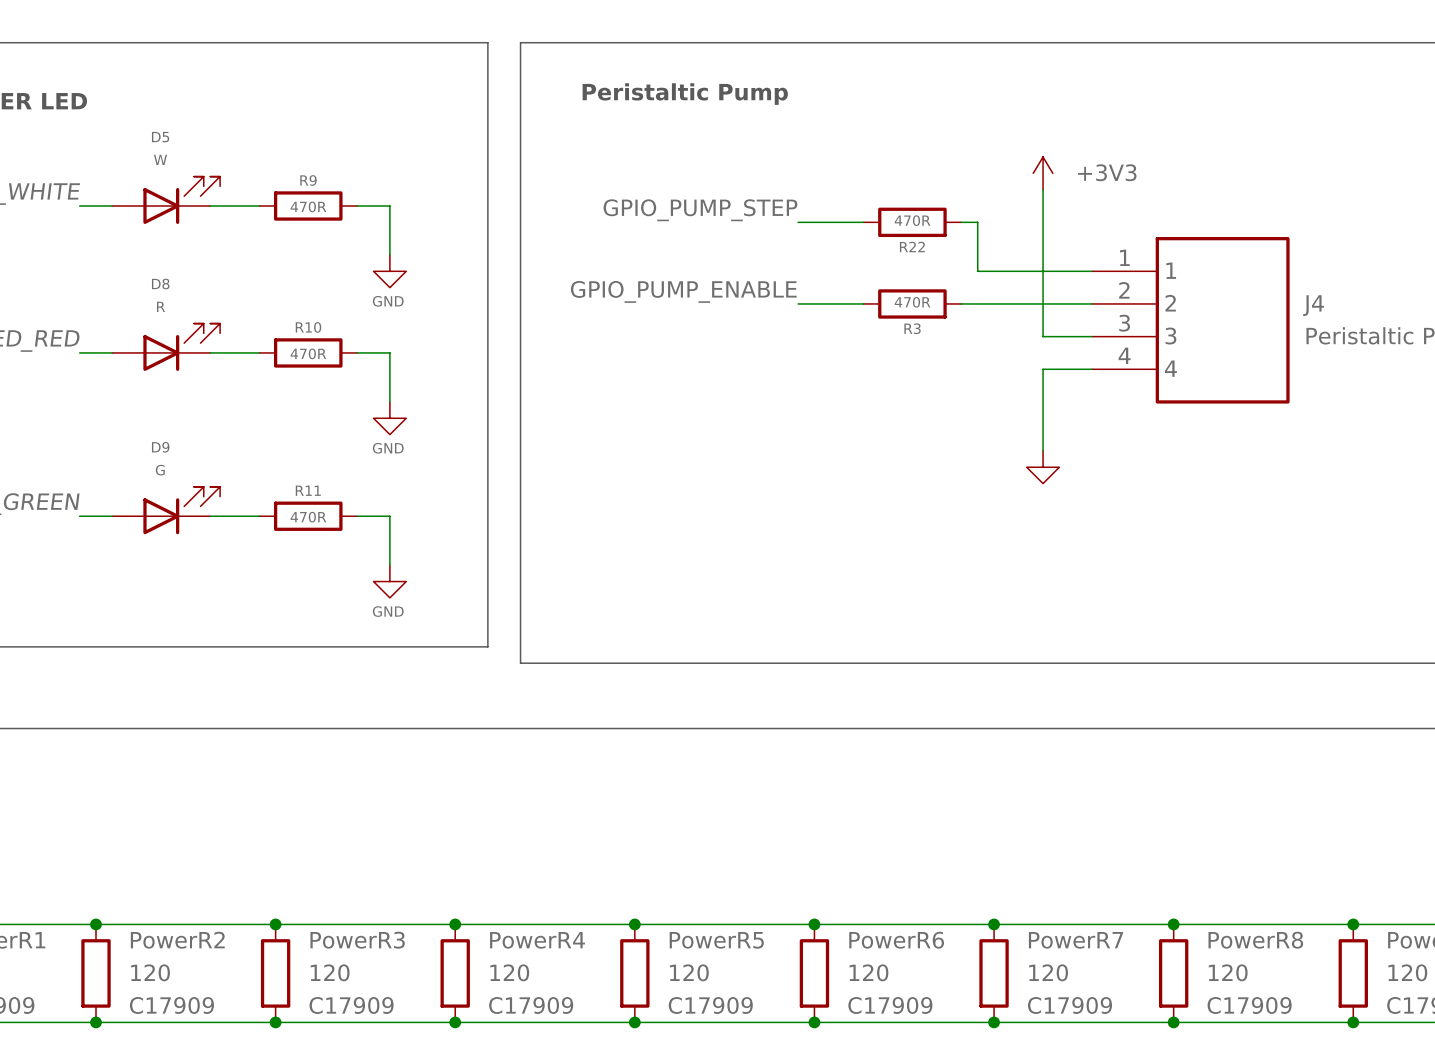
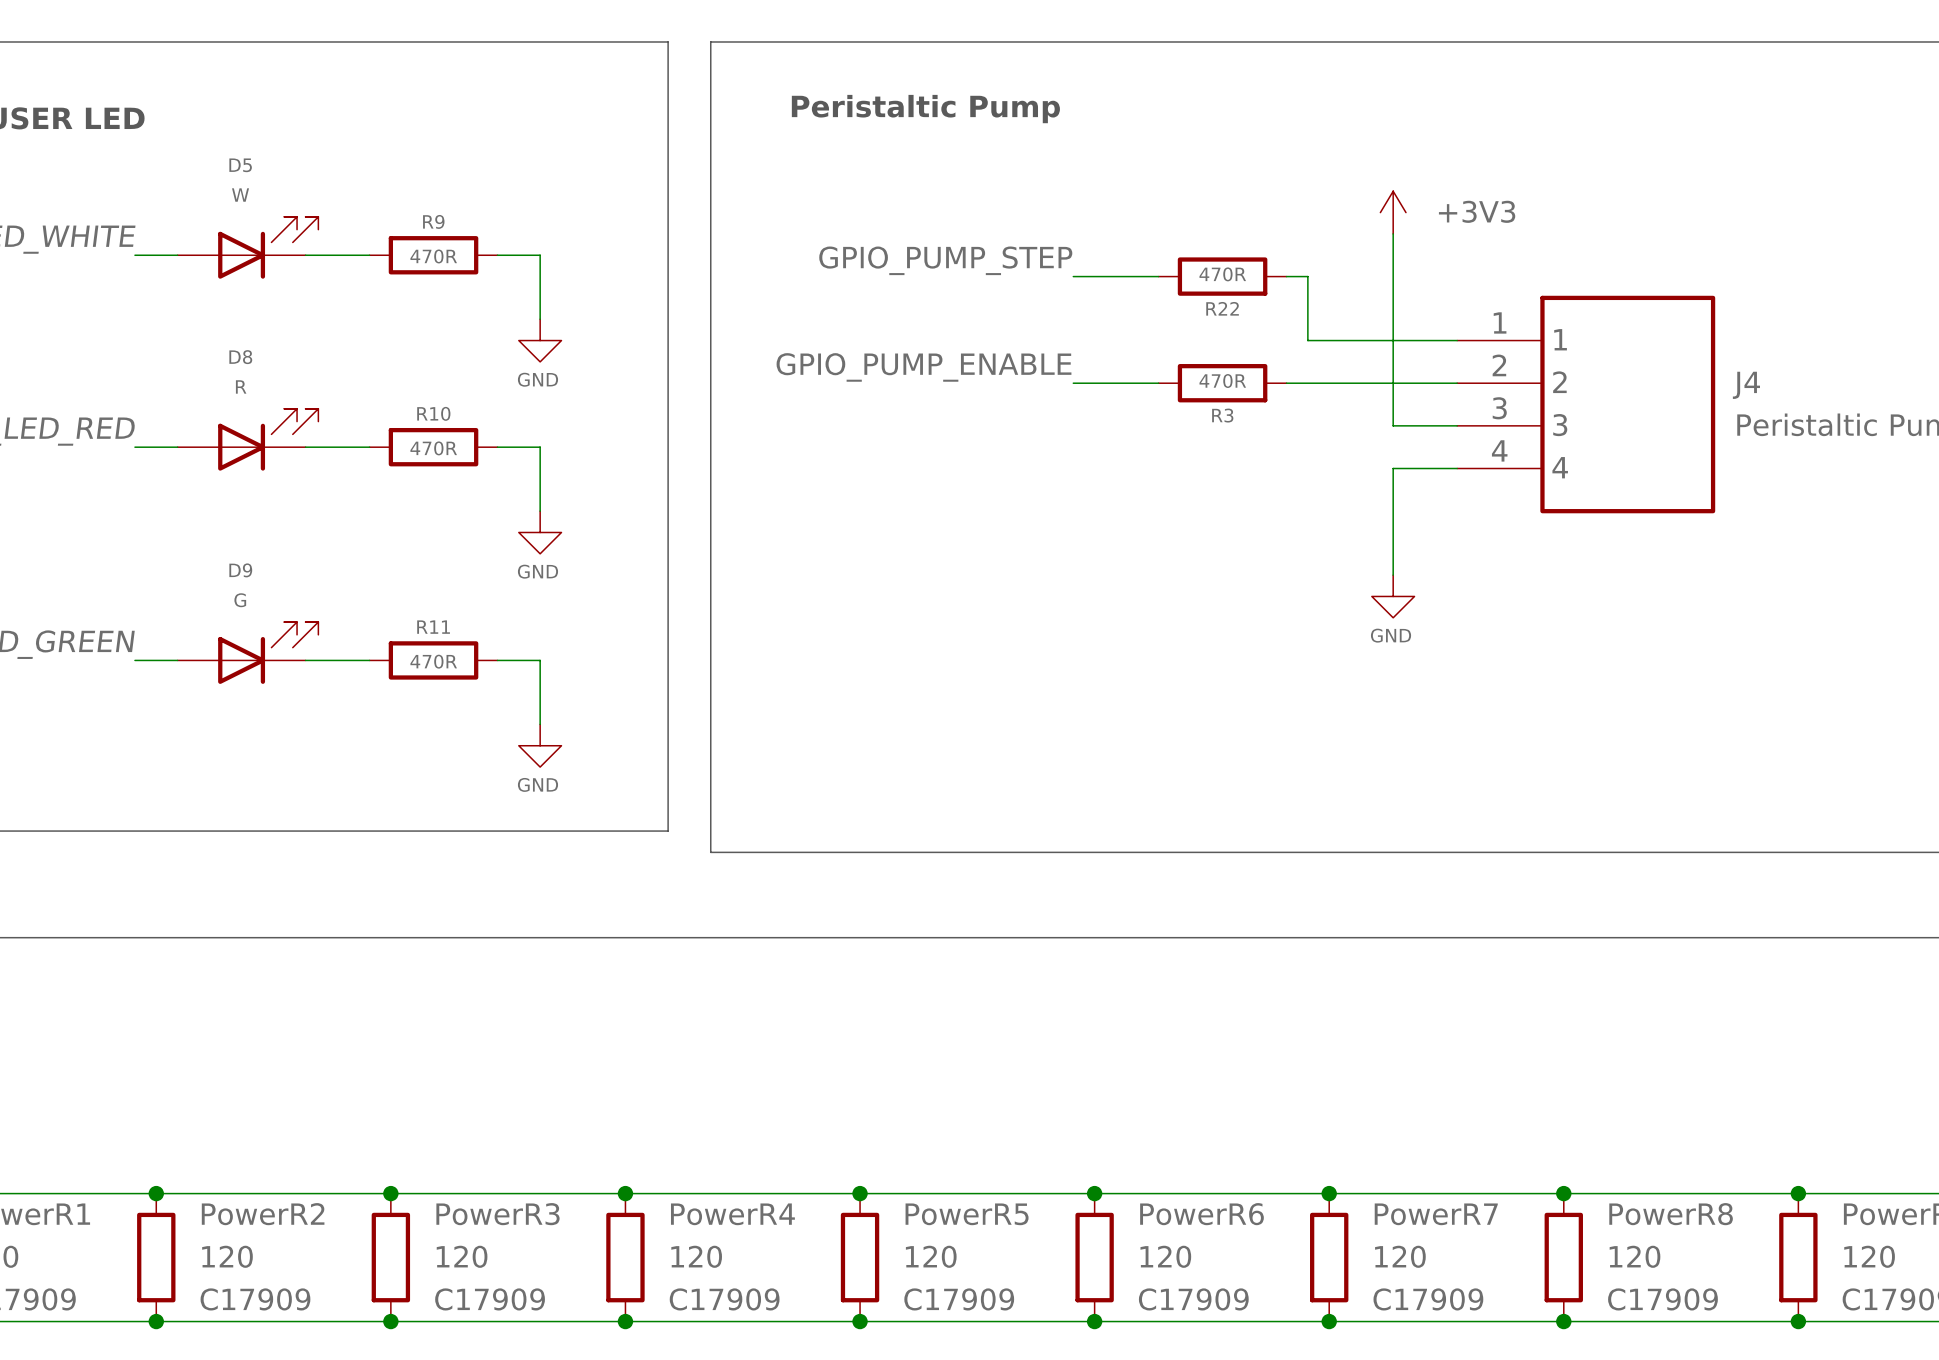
power symbol text: none -> GND (1391, 635)

